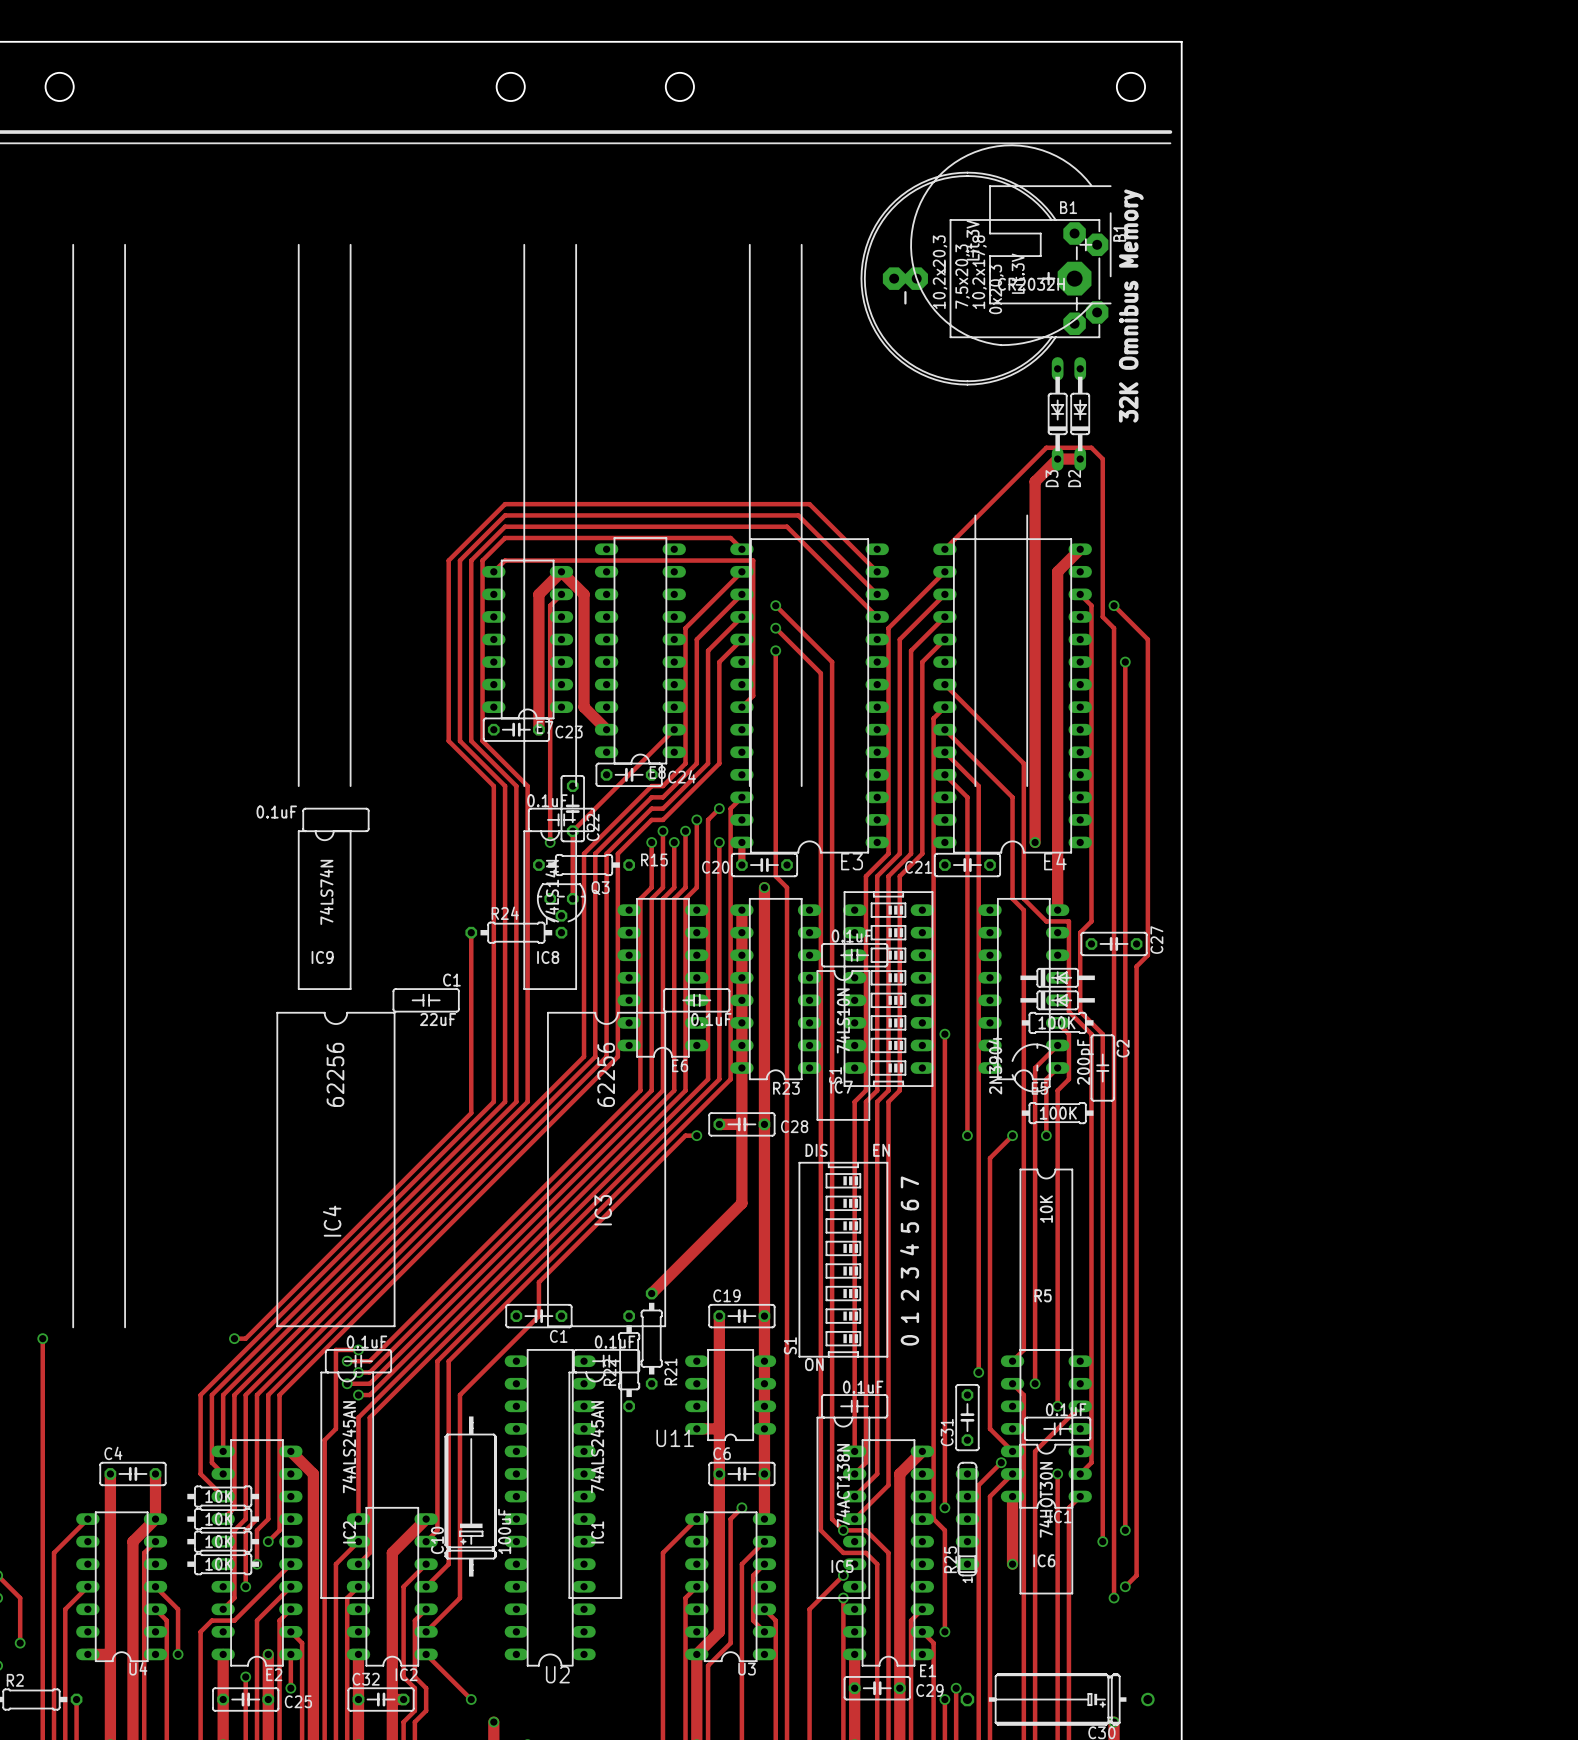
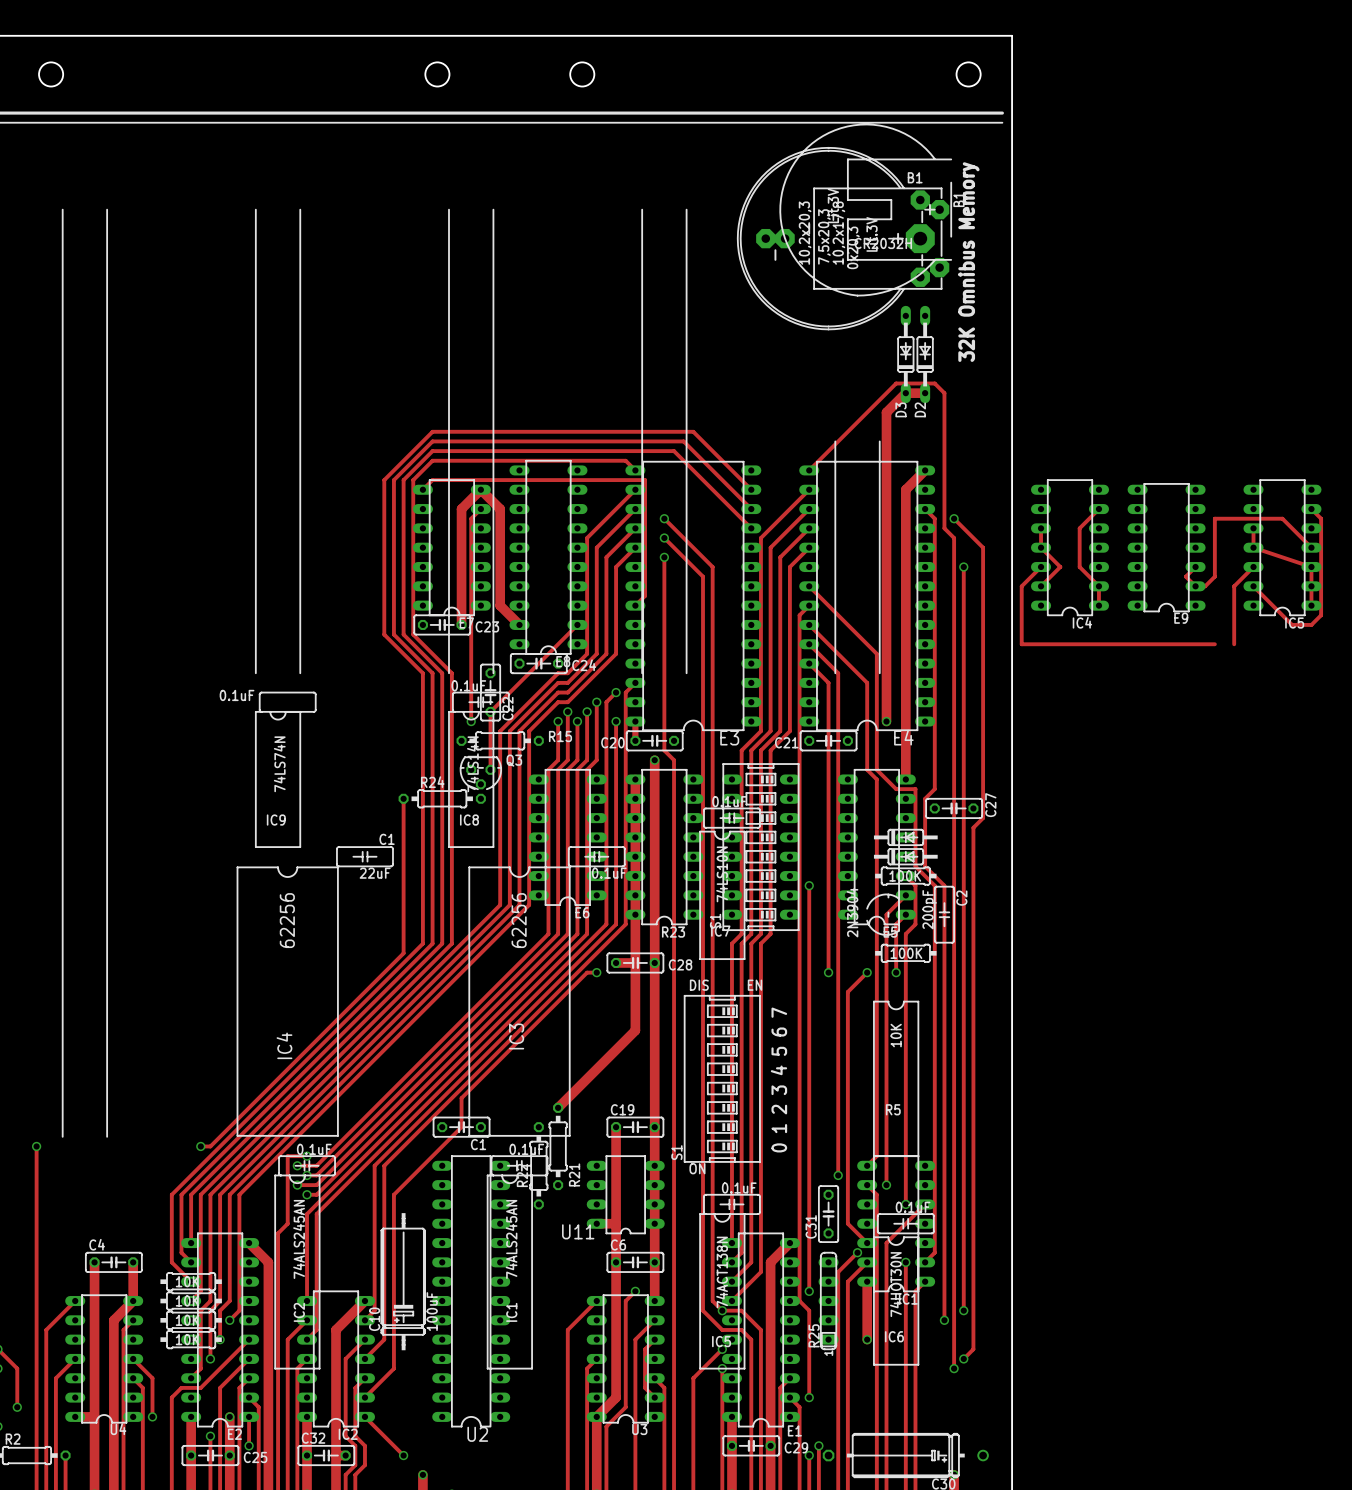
track: none -> (1098, 509) (1079, 528) (1079, 567) (1098, 586) (1098, 605)
track: none -> (1311, 509) (1321, 518) (1321, 615) (1311, 624) (1292, 624) (1253, 586)
track: none -> (1041, 528) (1041, 547) (1060, 567) (1041, 586)
track: none -> (1253, 528) (1253, 547) (1311, 567) (1311, 605)
IC4: none -> (1070, 547)
E9: none -> (1166, 547)
IC5: none -> (1282, 547)
track: none -> (1311, 547) (1282, 518) (1214, 518) (1214, 576) (1205, 586) (1195, 586) (1185, 576) (1195, 567)
track: none -> (1041, 567) (1021, 586) (1021, 644) (1214, 644)
track: none -> (1253, 567) (1234, 586) (1234, 644)

